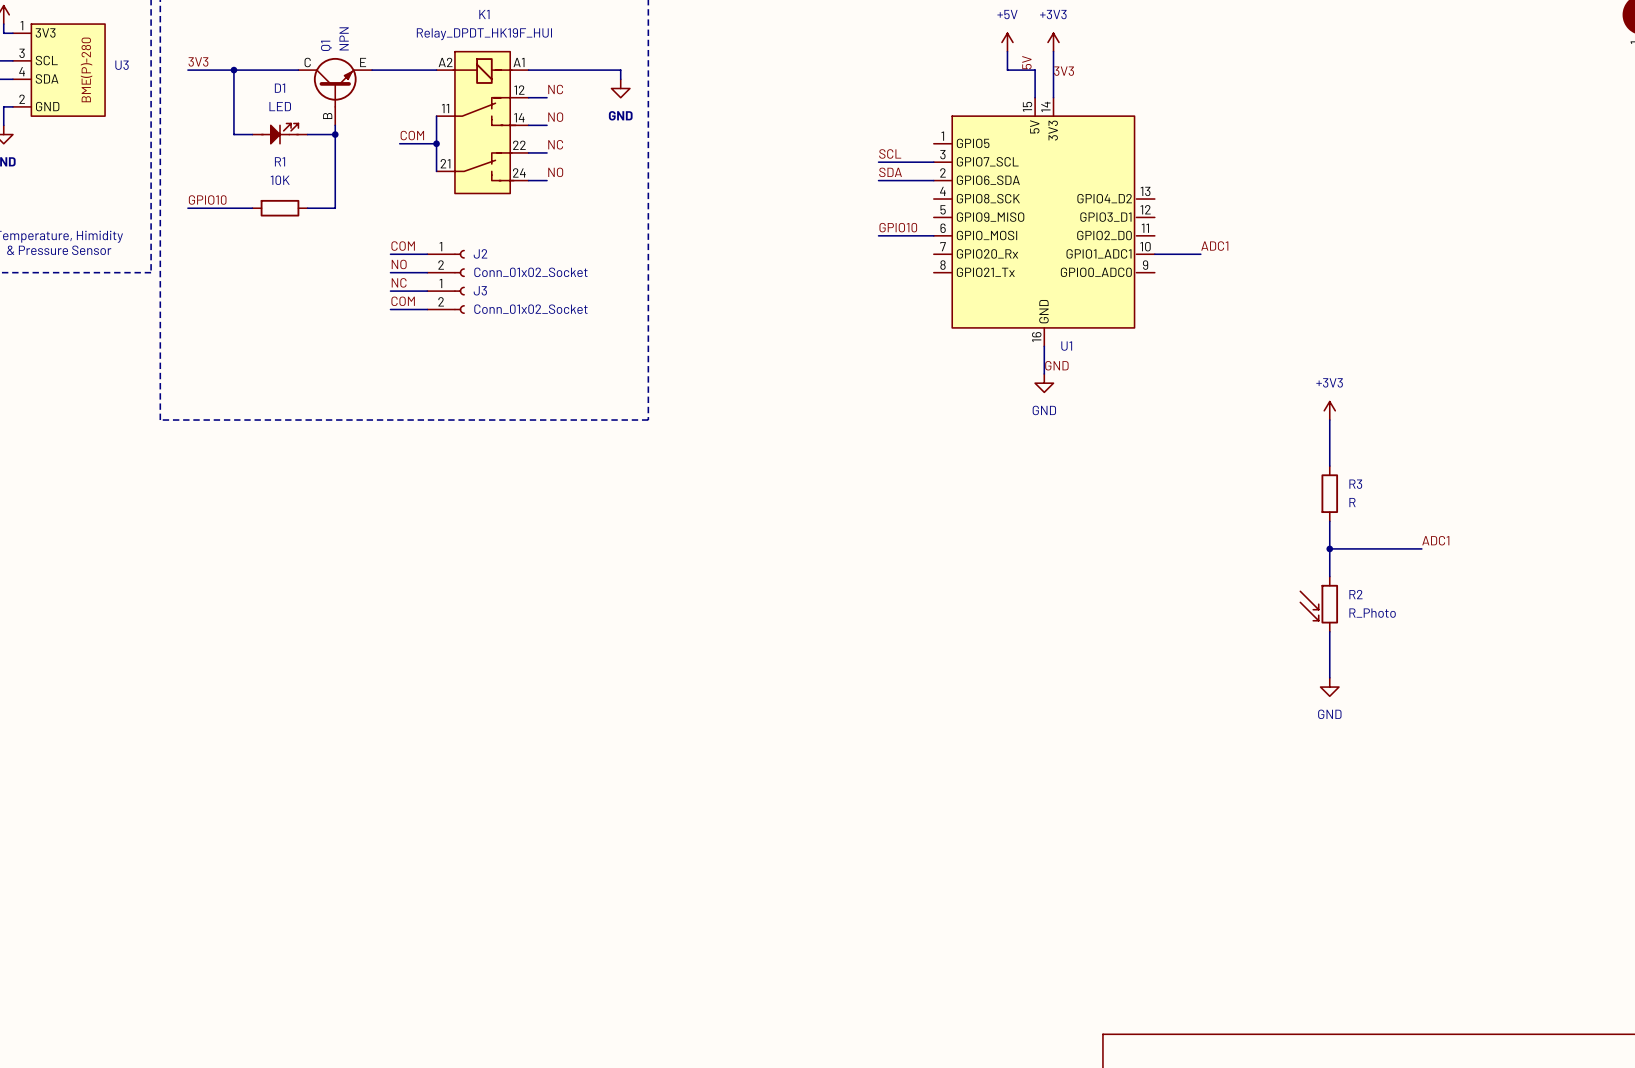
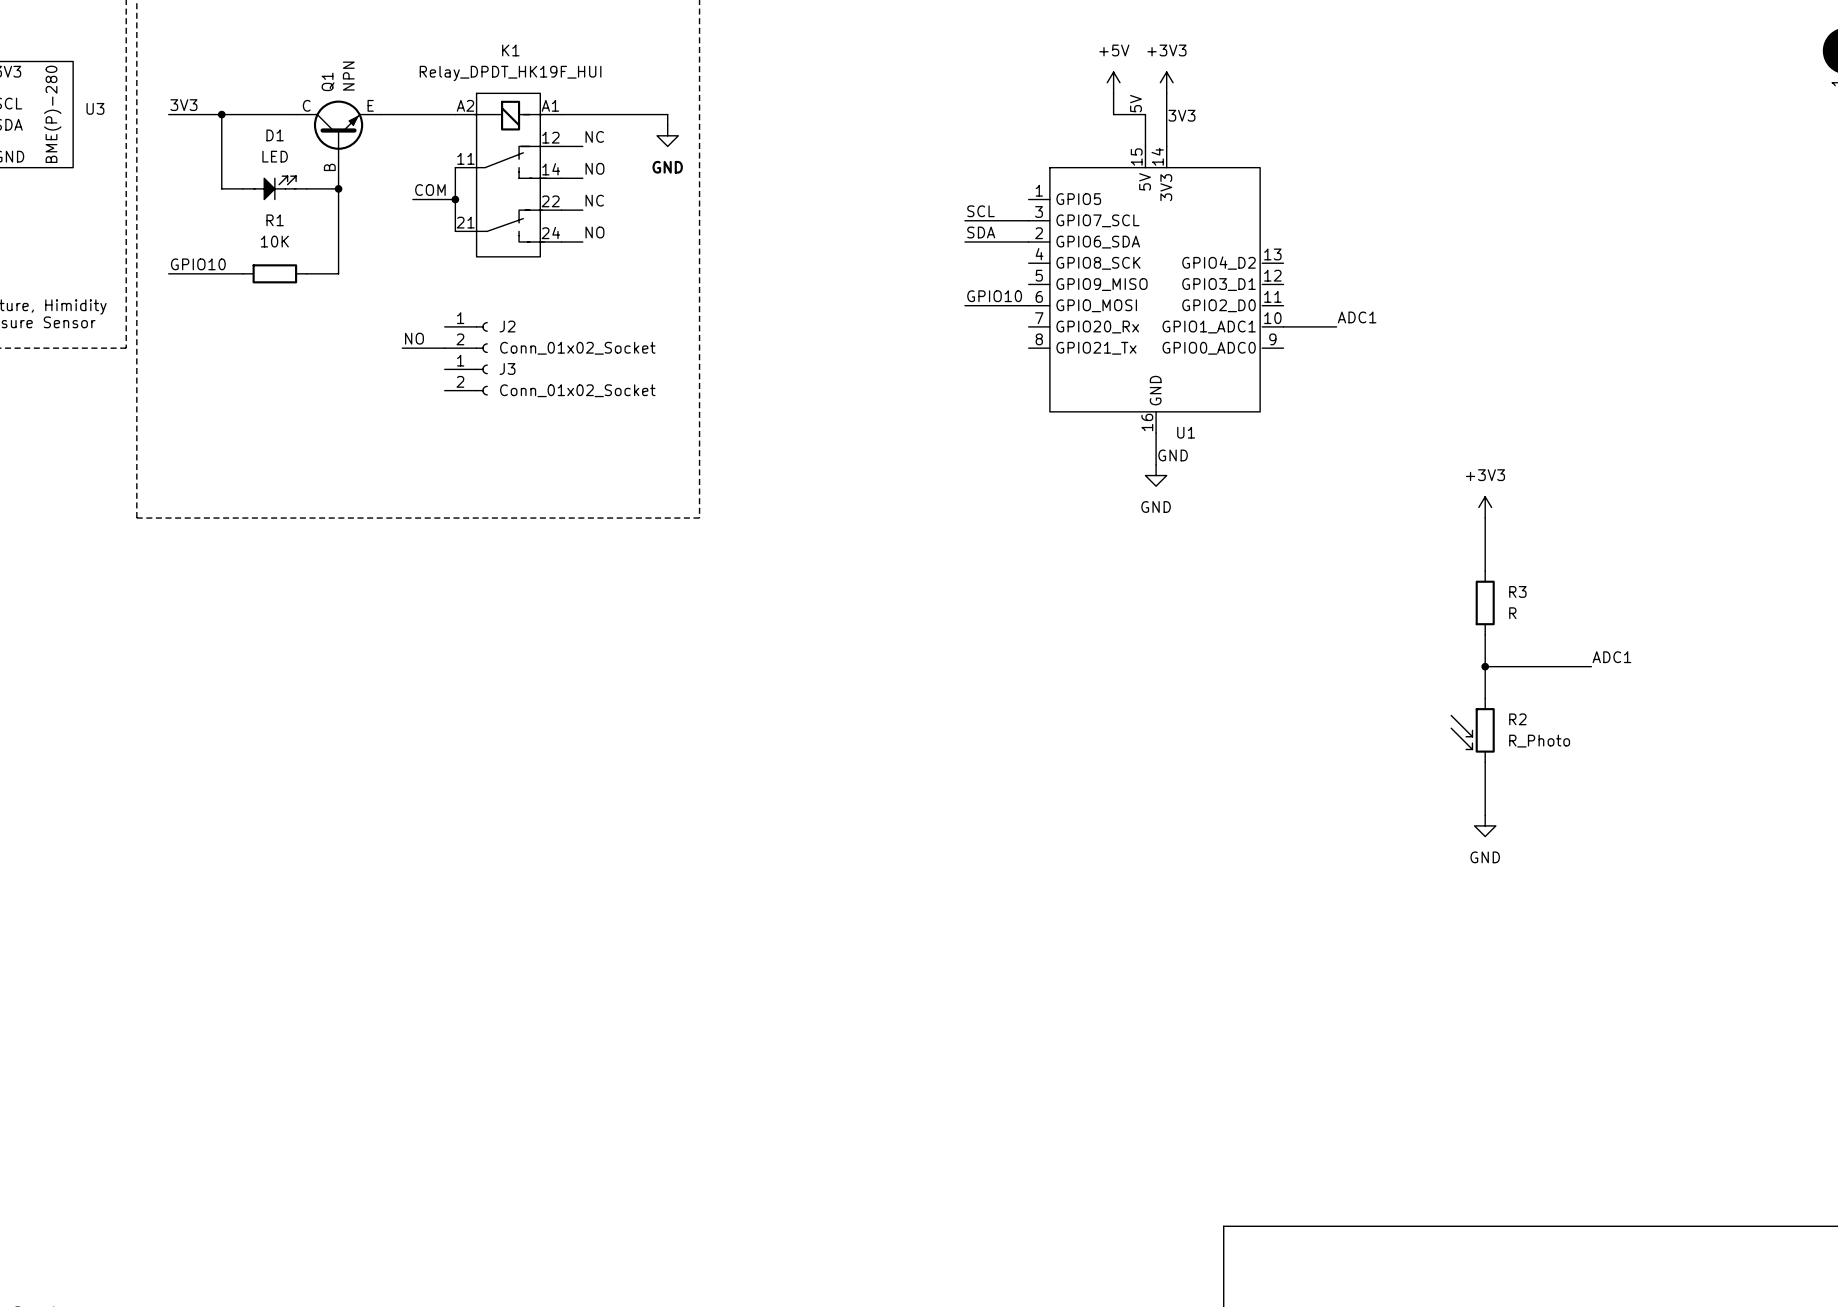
label: COM (403, 246) -> none
wire: (390, 254) (427, 254) -> none
label: NC (399, 282) -> none
wire: (390, 291) (427, 291) -> none
label: COM (403, 301) -> none
wire: (390, 309) (427, 309) -> none

